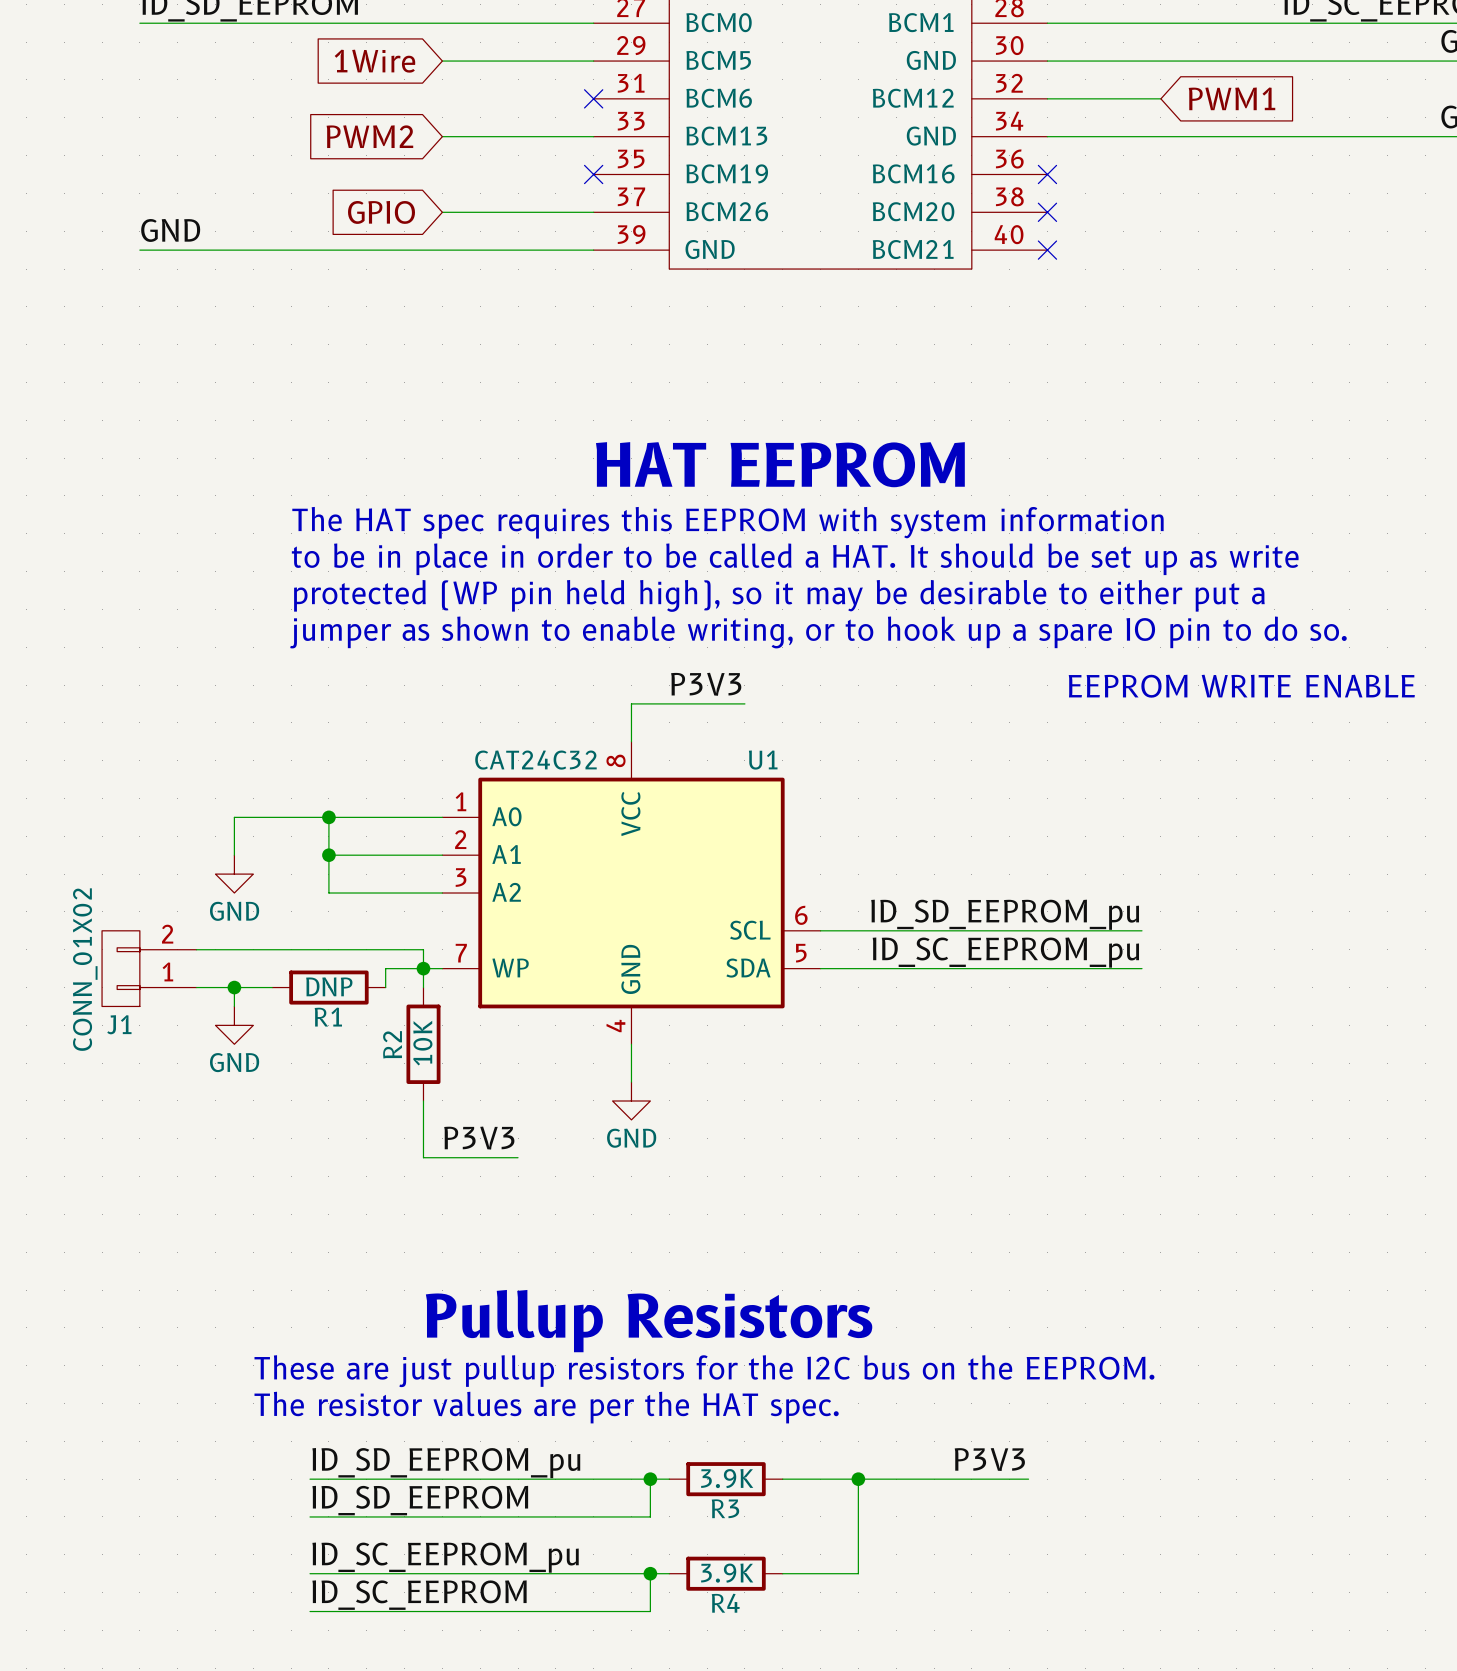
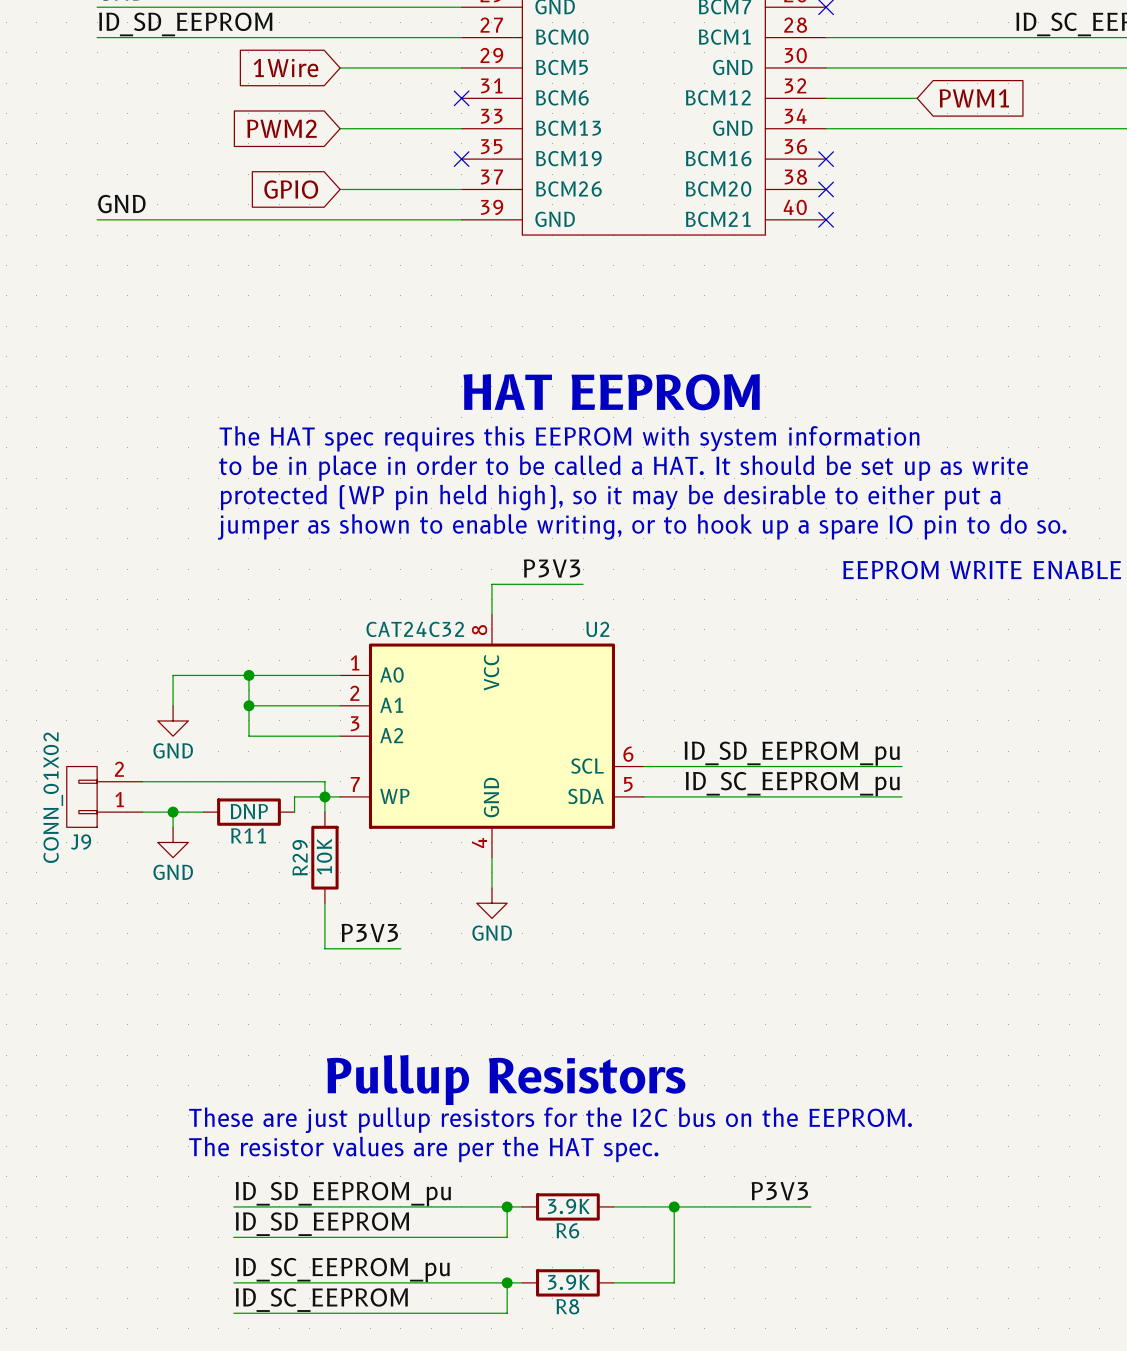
U1 name: U1 (763, 760) -> U2 (597, 629)
R1 name: R1 (328, 1017) -> R11 (248, 835)
J1 name: J1 (119, 1024) -> J9 (81, 842)
R2 name: R2 (392, 1044) -> R29 (300, 857)
R3 name: R3 (725, 1508) -> R6 (567, 1230)
R4 name: R4 (725, 1603) -> R8 (567, 1306)

